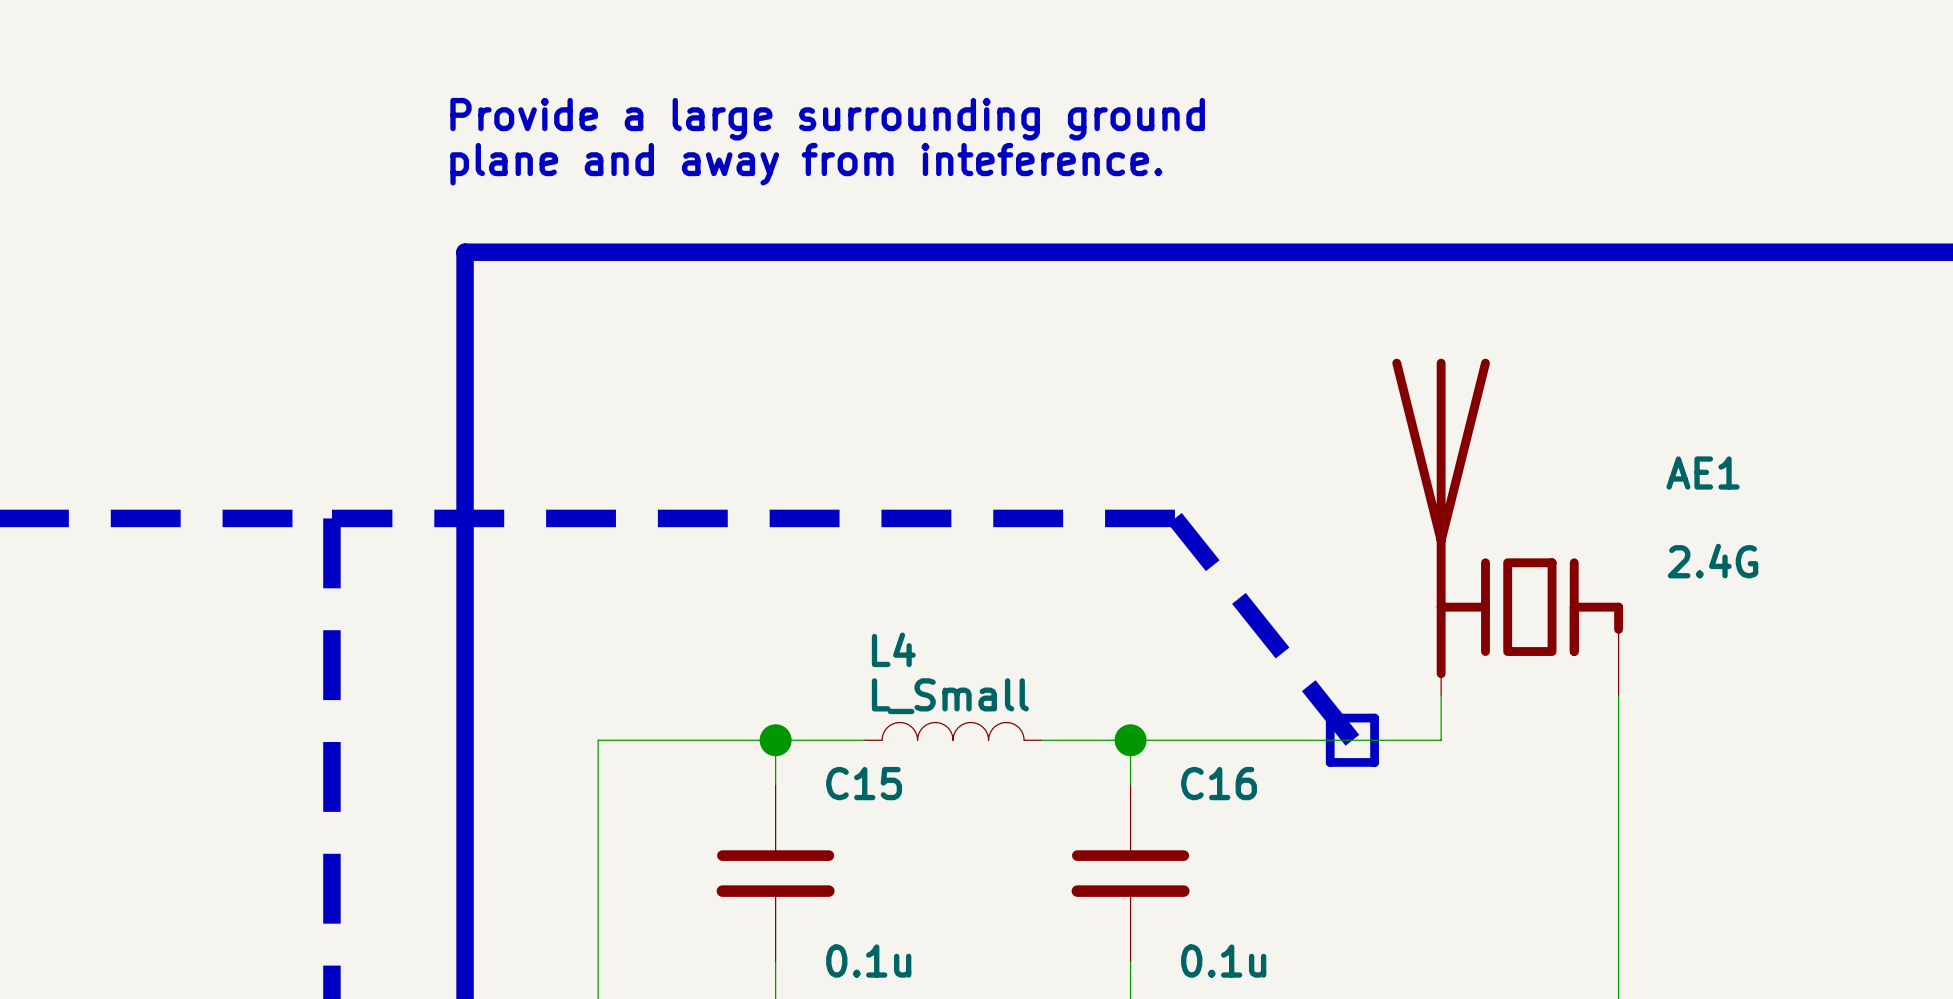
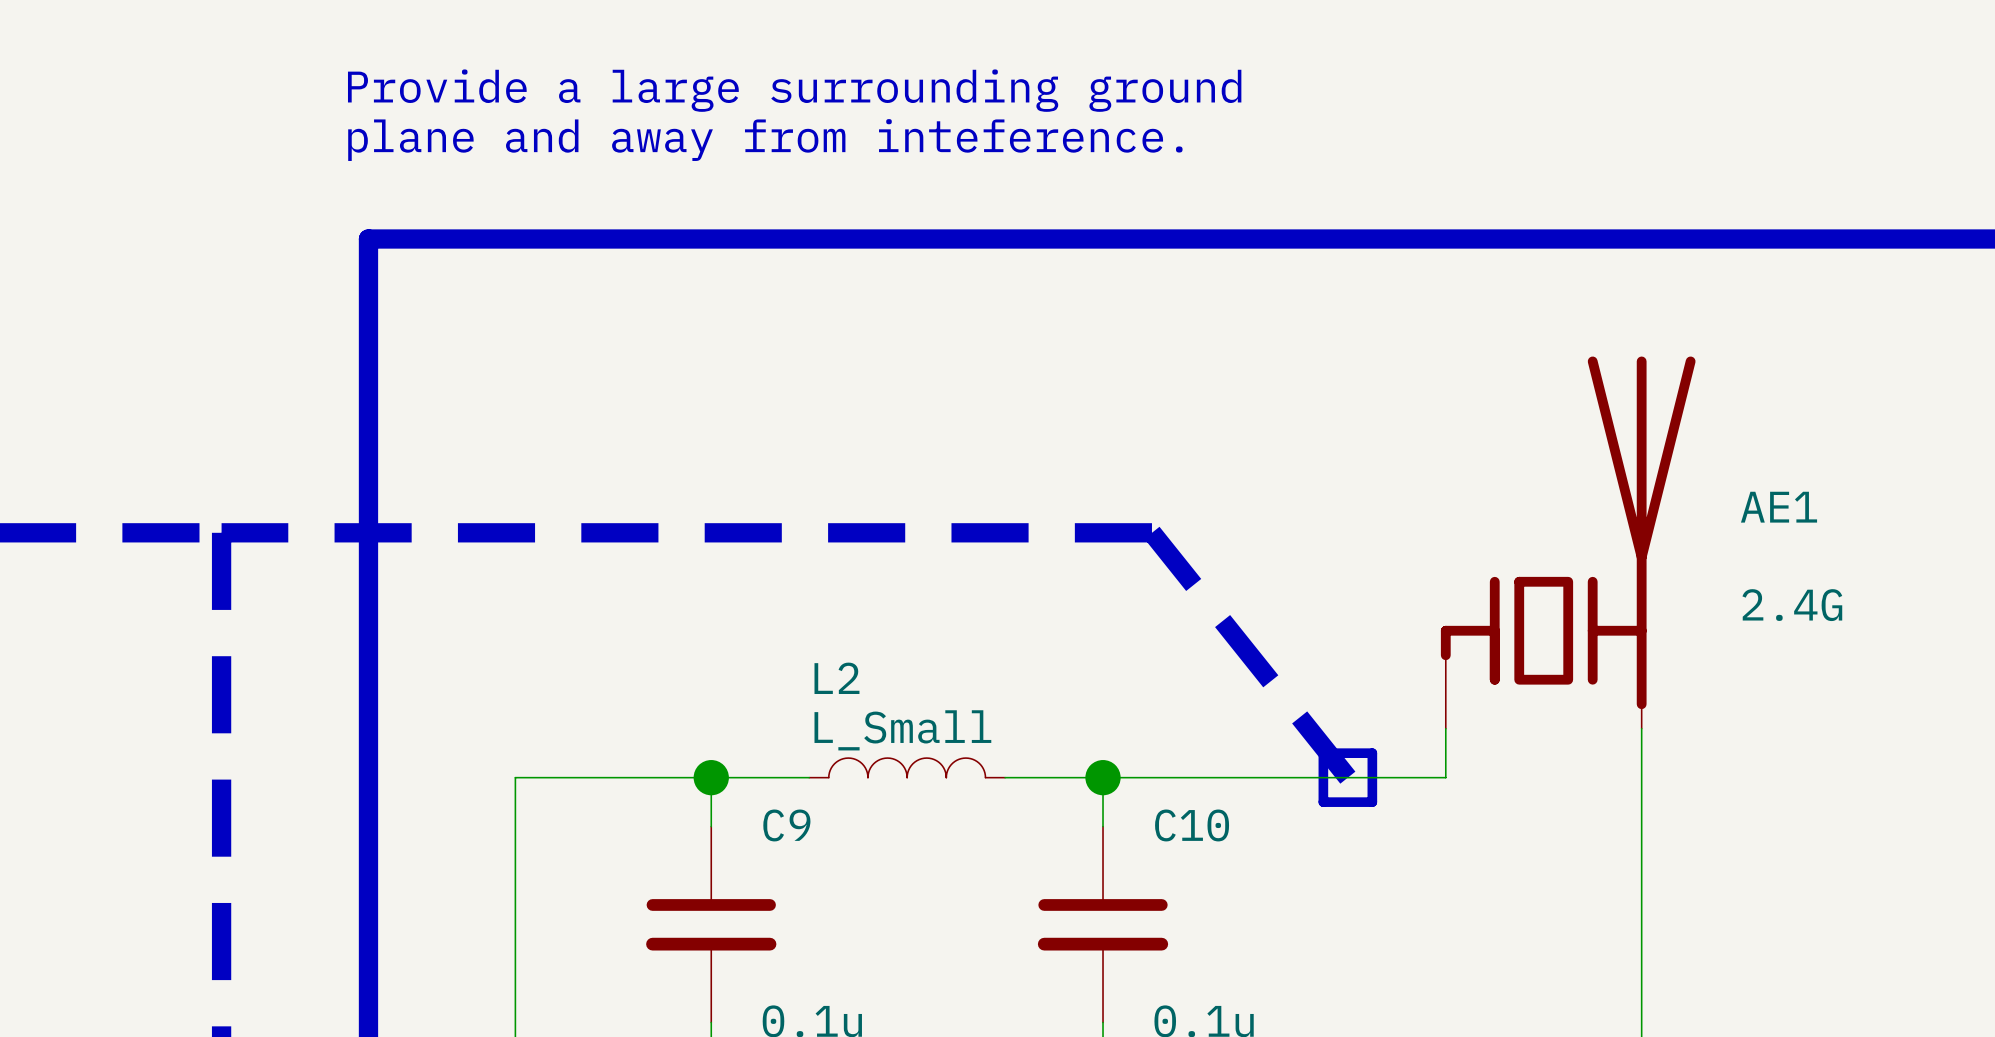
AE1 flip: as is (1507, 518) -> left-right (1568, 532)
L4 name: L4 (893, 649) -> L2 (836, 678)
C15 name: C15 (864, 783) -> C9 (786, 825)
C16 name: C16 (1219, 783) -> C10 (1192, 825)

